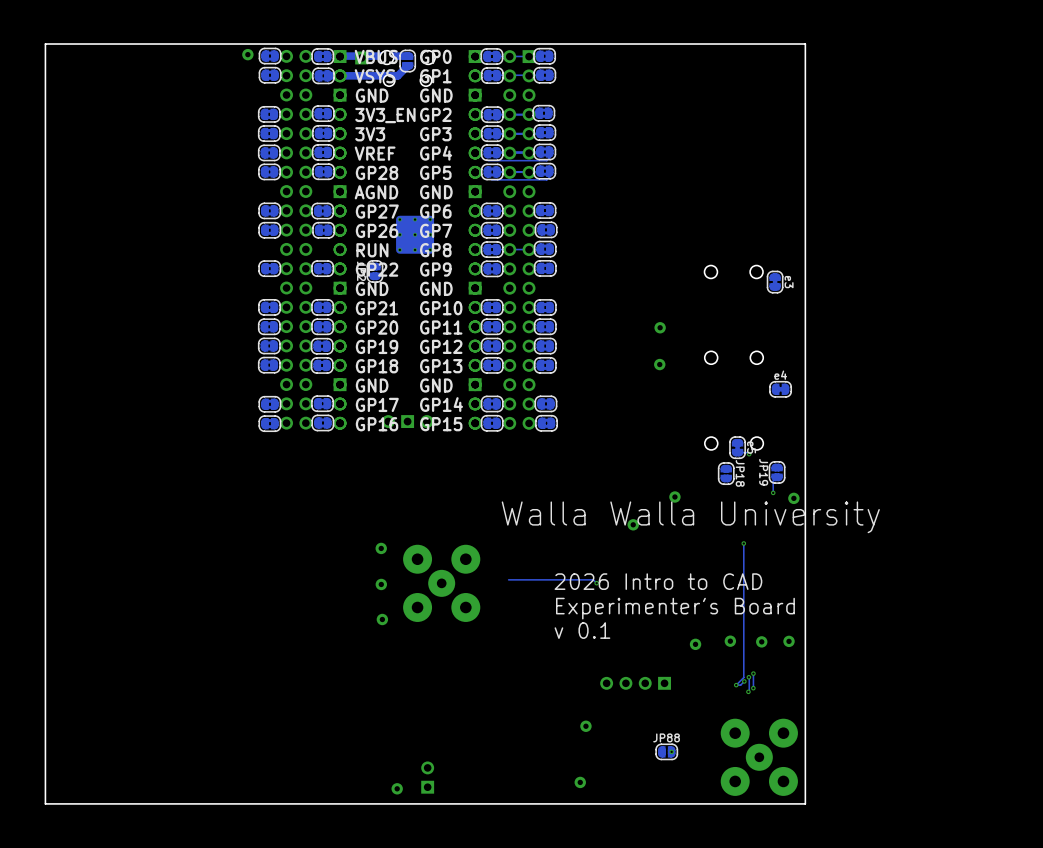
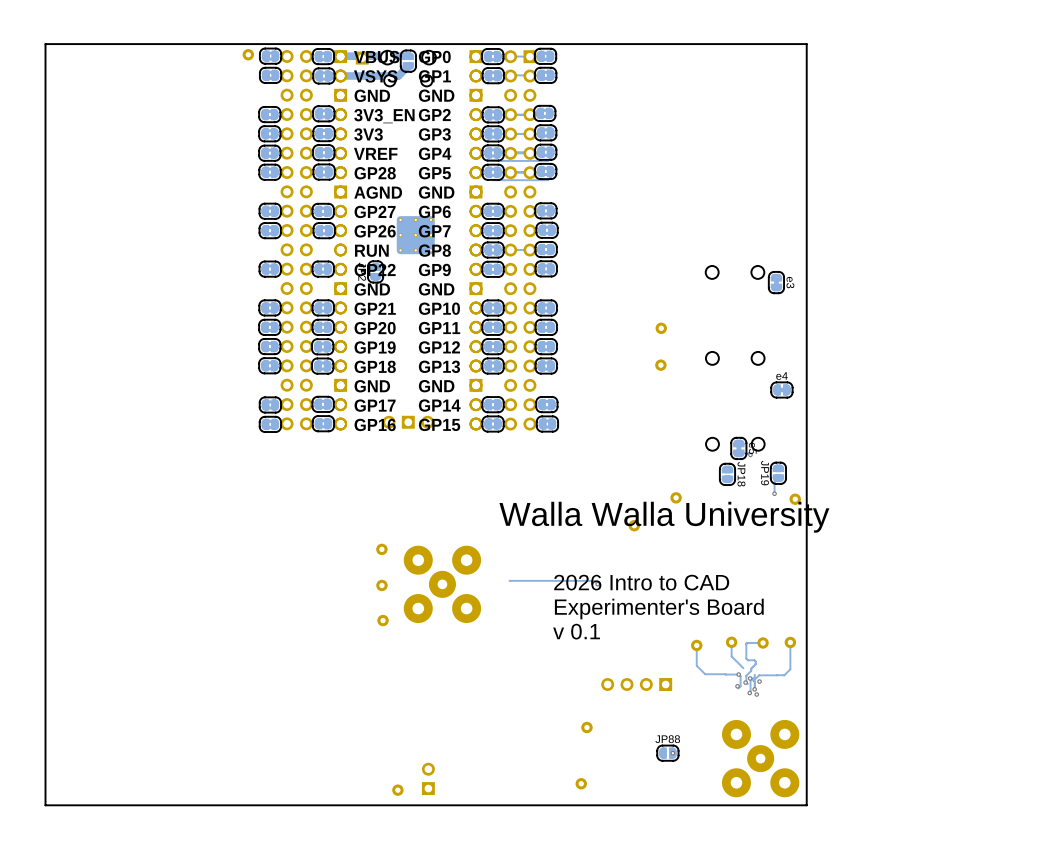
track: (743, 543) (743, 677) (736, 685) (740, 685) (744, 681) -> none
via: (743, 543) -> none
track: none -> (731, 642) (731, 656) (743, 668)
track: none -> (763, 642) (746, 643) (746, 658) (755, 661) (752, 667)
track: none -> (790, 642) (790, 669) (784, 675)
track: none -> (696, 645) (696, 666) (705, 674) (738, 674) (740, 676) (740, 686) (738, 688)
track: none -> (753, 666) (746, 675) (747, 683)
via: none -> (738, 674)
via: (753, 673) -> none
track: none -> (784, 675) (759, 675) (756, 678) (751, 678) (754, 682) (754, 688)
via: none -> (759, 681)
via: none -> (756, 694)

